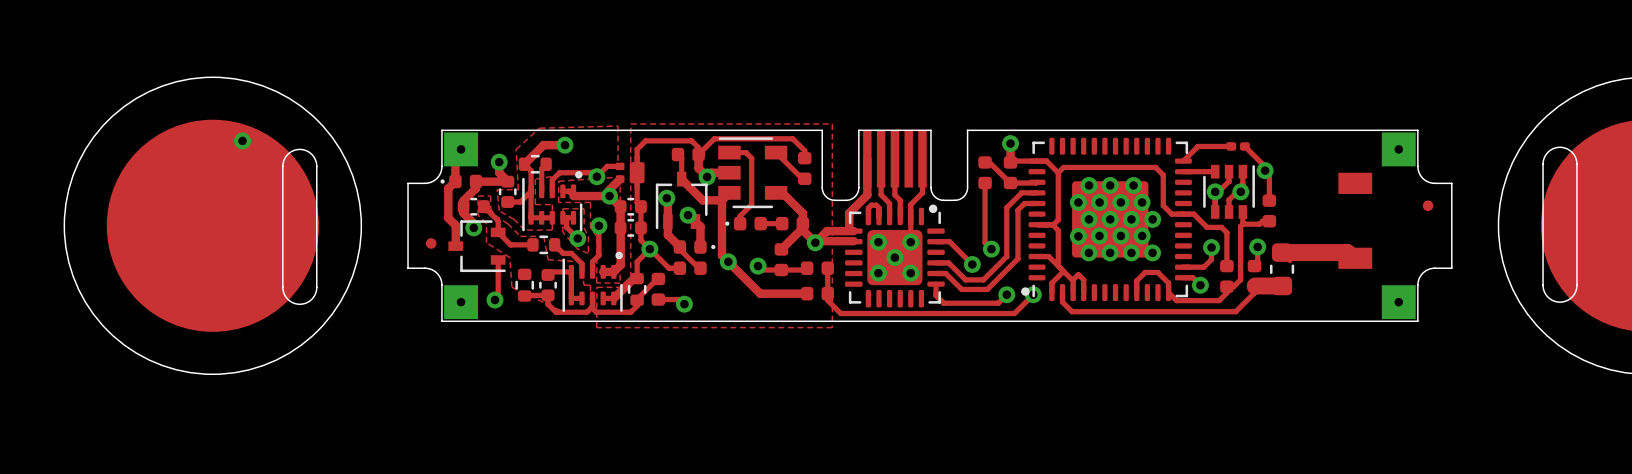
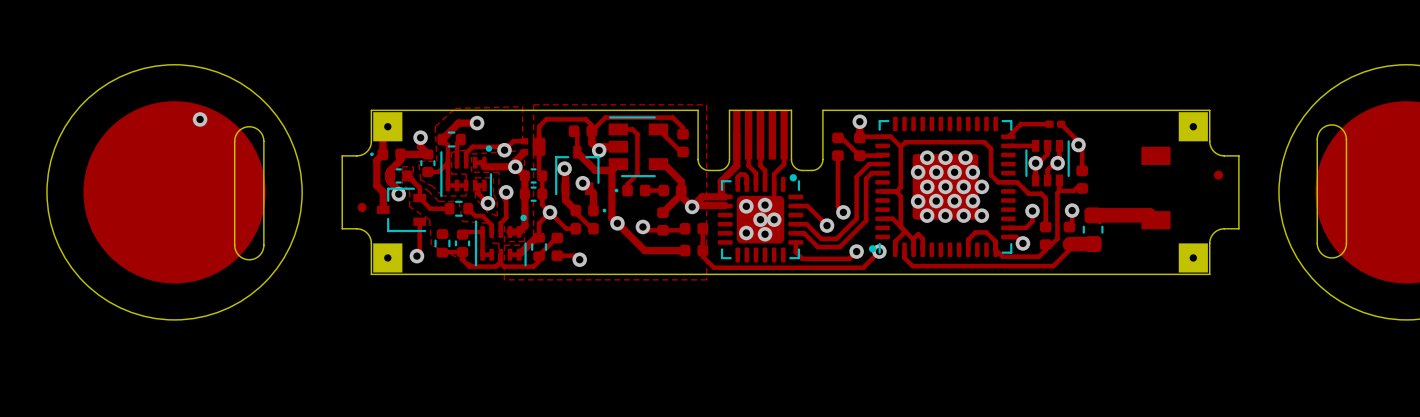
via: none -> (765, 205)
via: (910, 242) -> none
via: none -> (774, 219)
via: (910, 273) -> none
via: none -> (765, 234)

